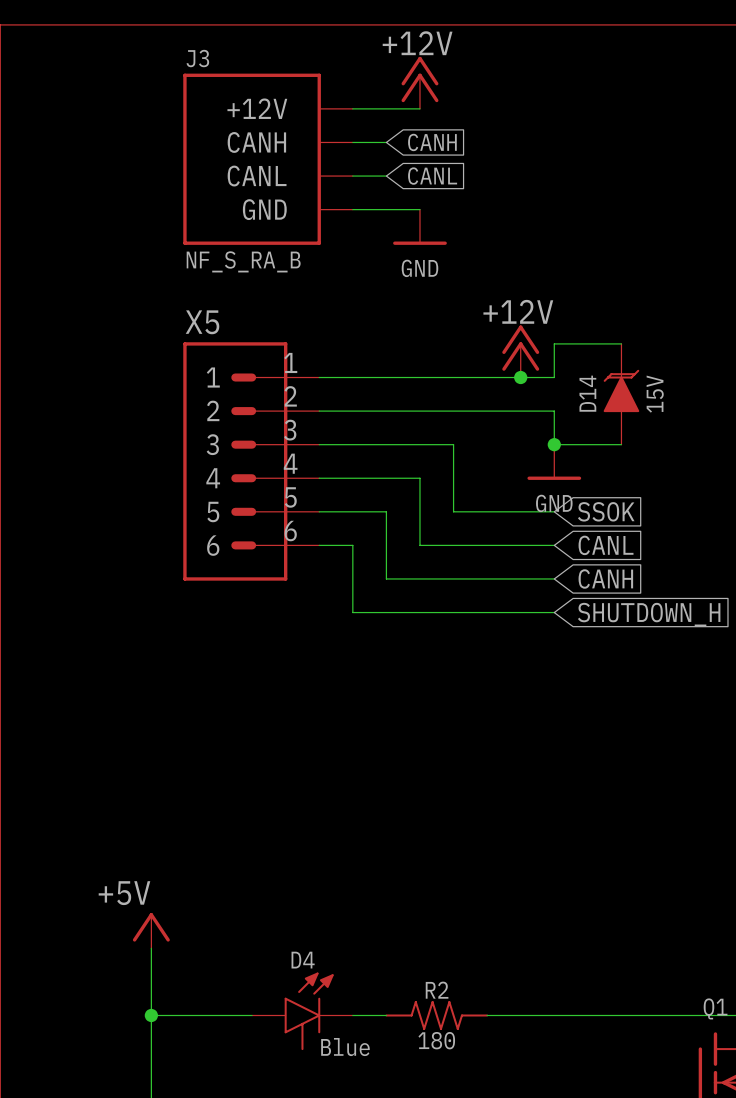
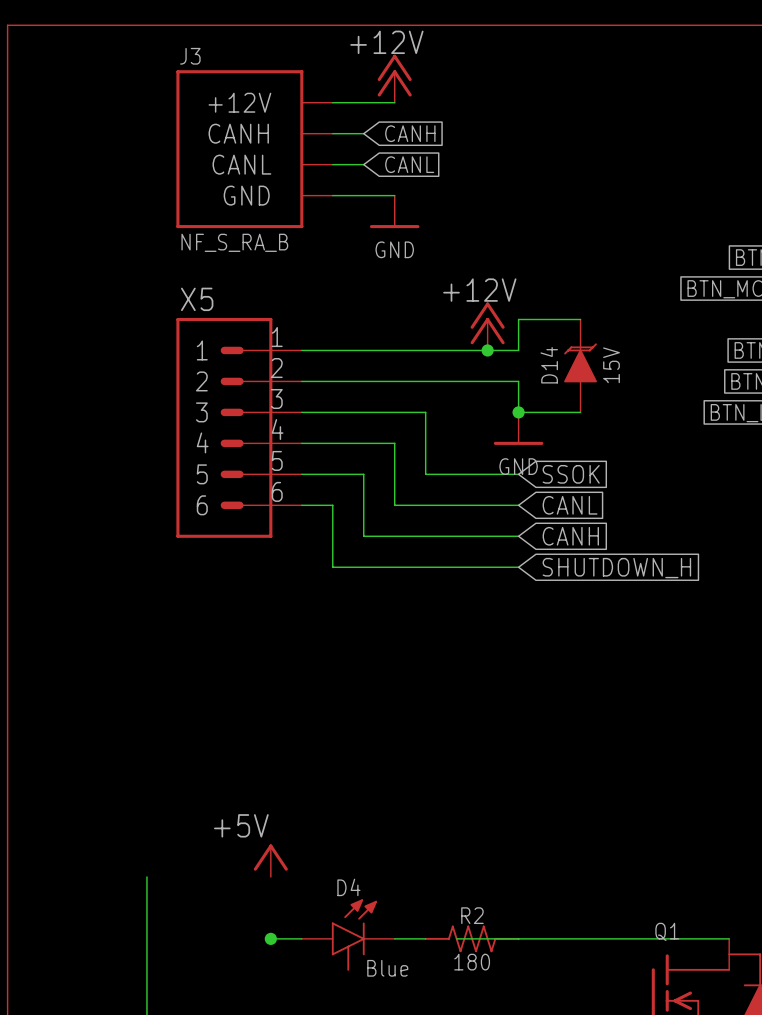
power symbol position: +5V (151, 930) -> +5V (270, 860)
D4 position: (302, 1011) -> (348, 935)
wire: (151, 1015) (252, 1015) -> none
junction: (151, 1015) -> none
wire: none -> (270, 938) (301, 938)
junction: none -> (270, 938)
wire: (352, 1015) (386, 1015) -> (394, 938) (425, 938)
R2 position: (436, 1015) -> (472, 938)

